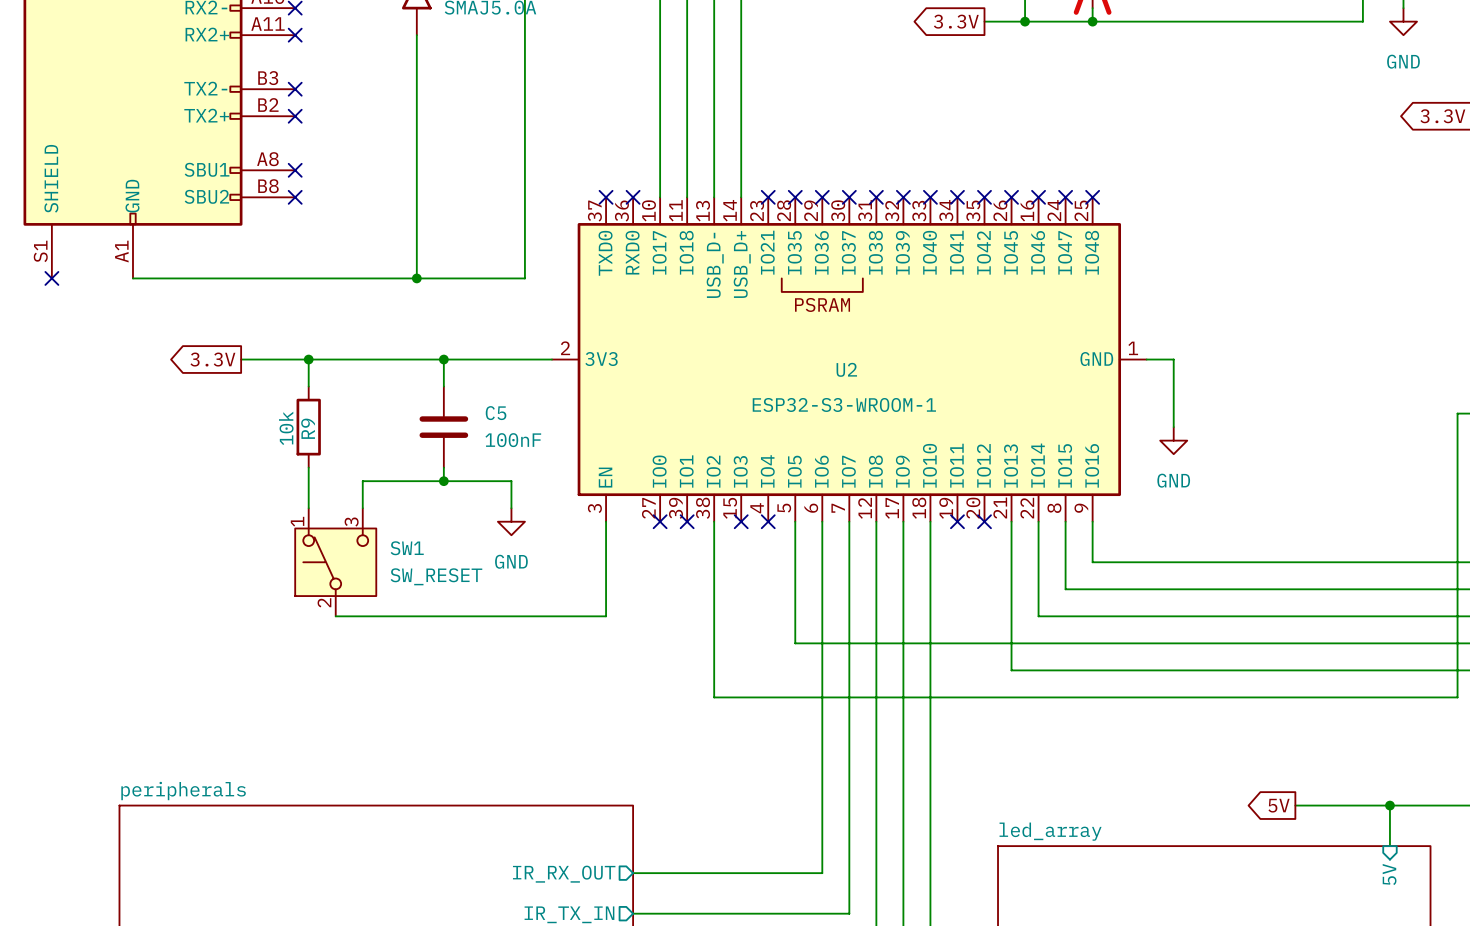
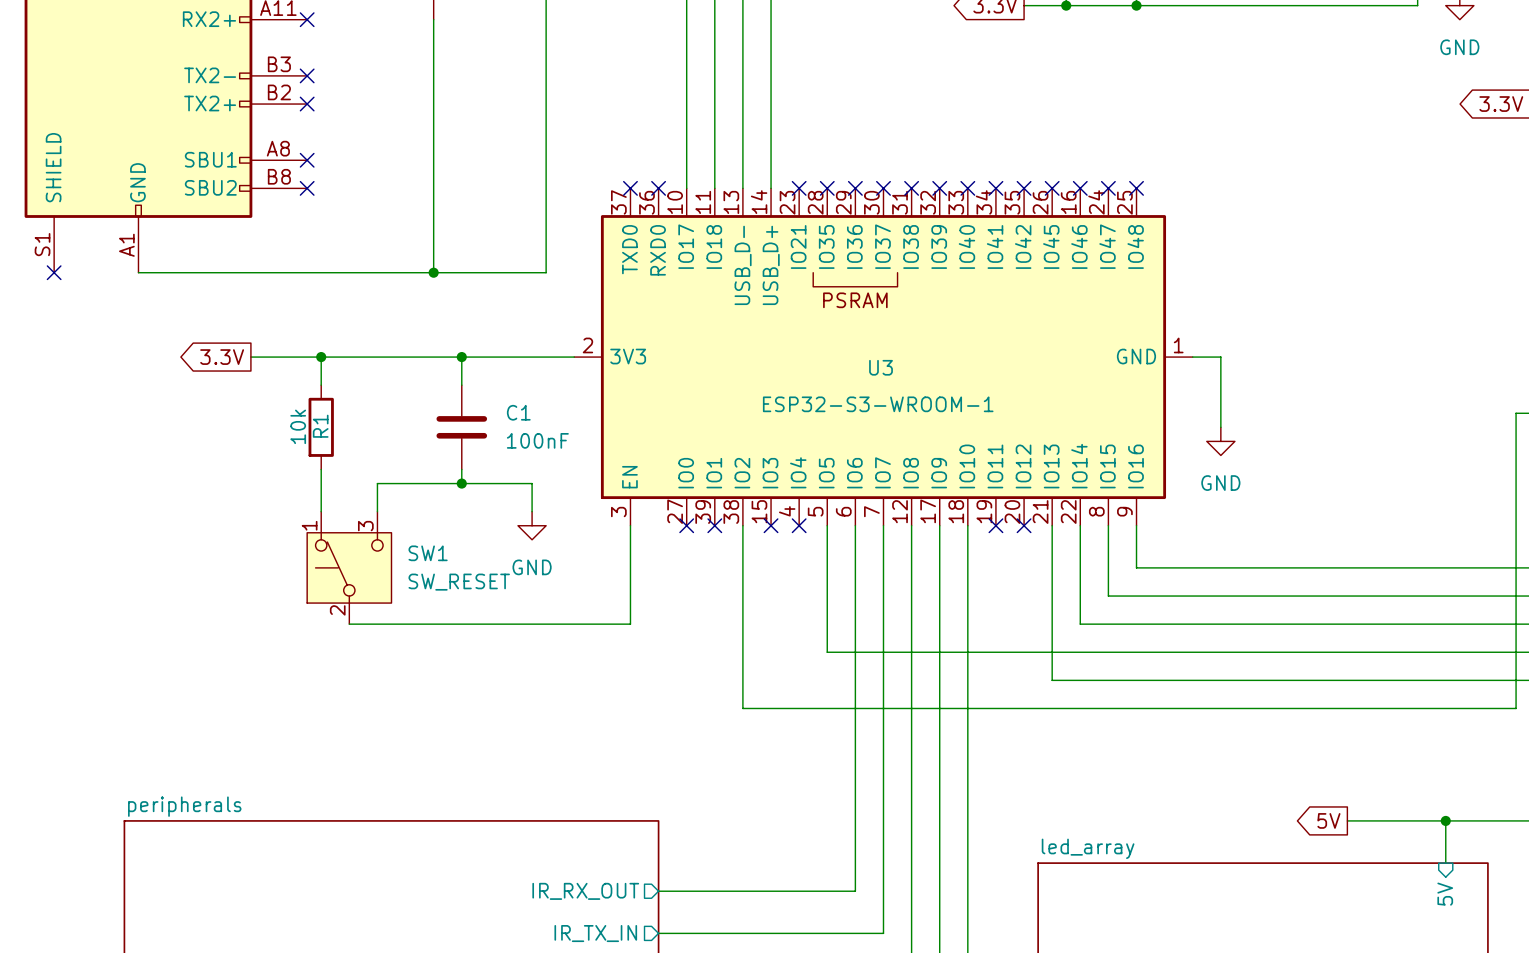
U2 name: U2 (846, 369) -> U3 (881, 367)
C5 name: C5 (496, 413) -> C1 (518, 412)
R9 name: R9 (308, 428) -> R1 (320, 426)

